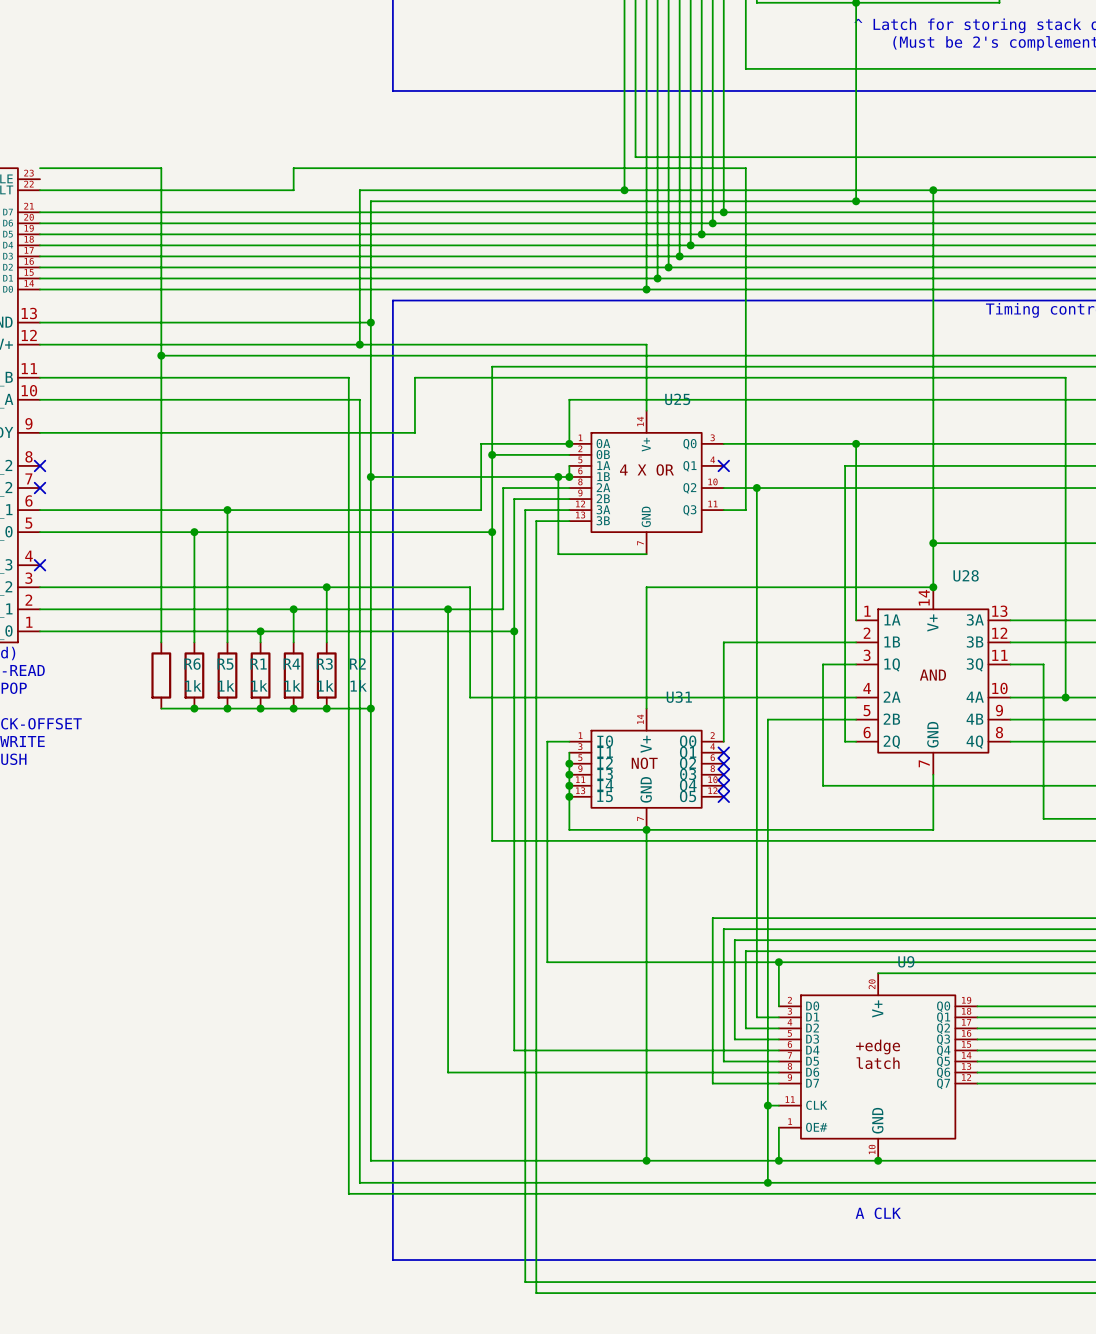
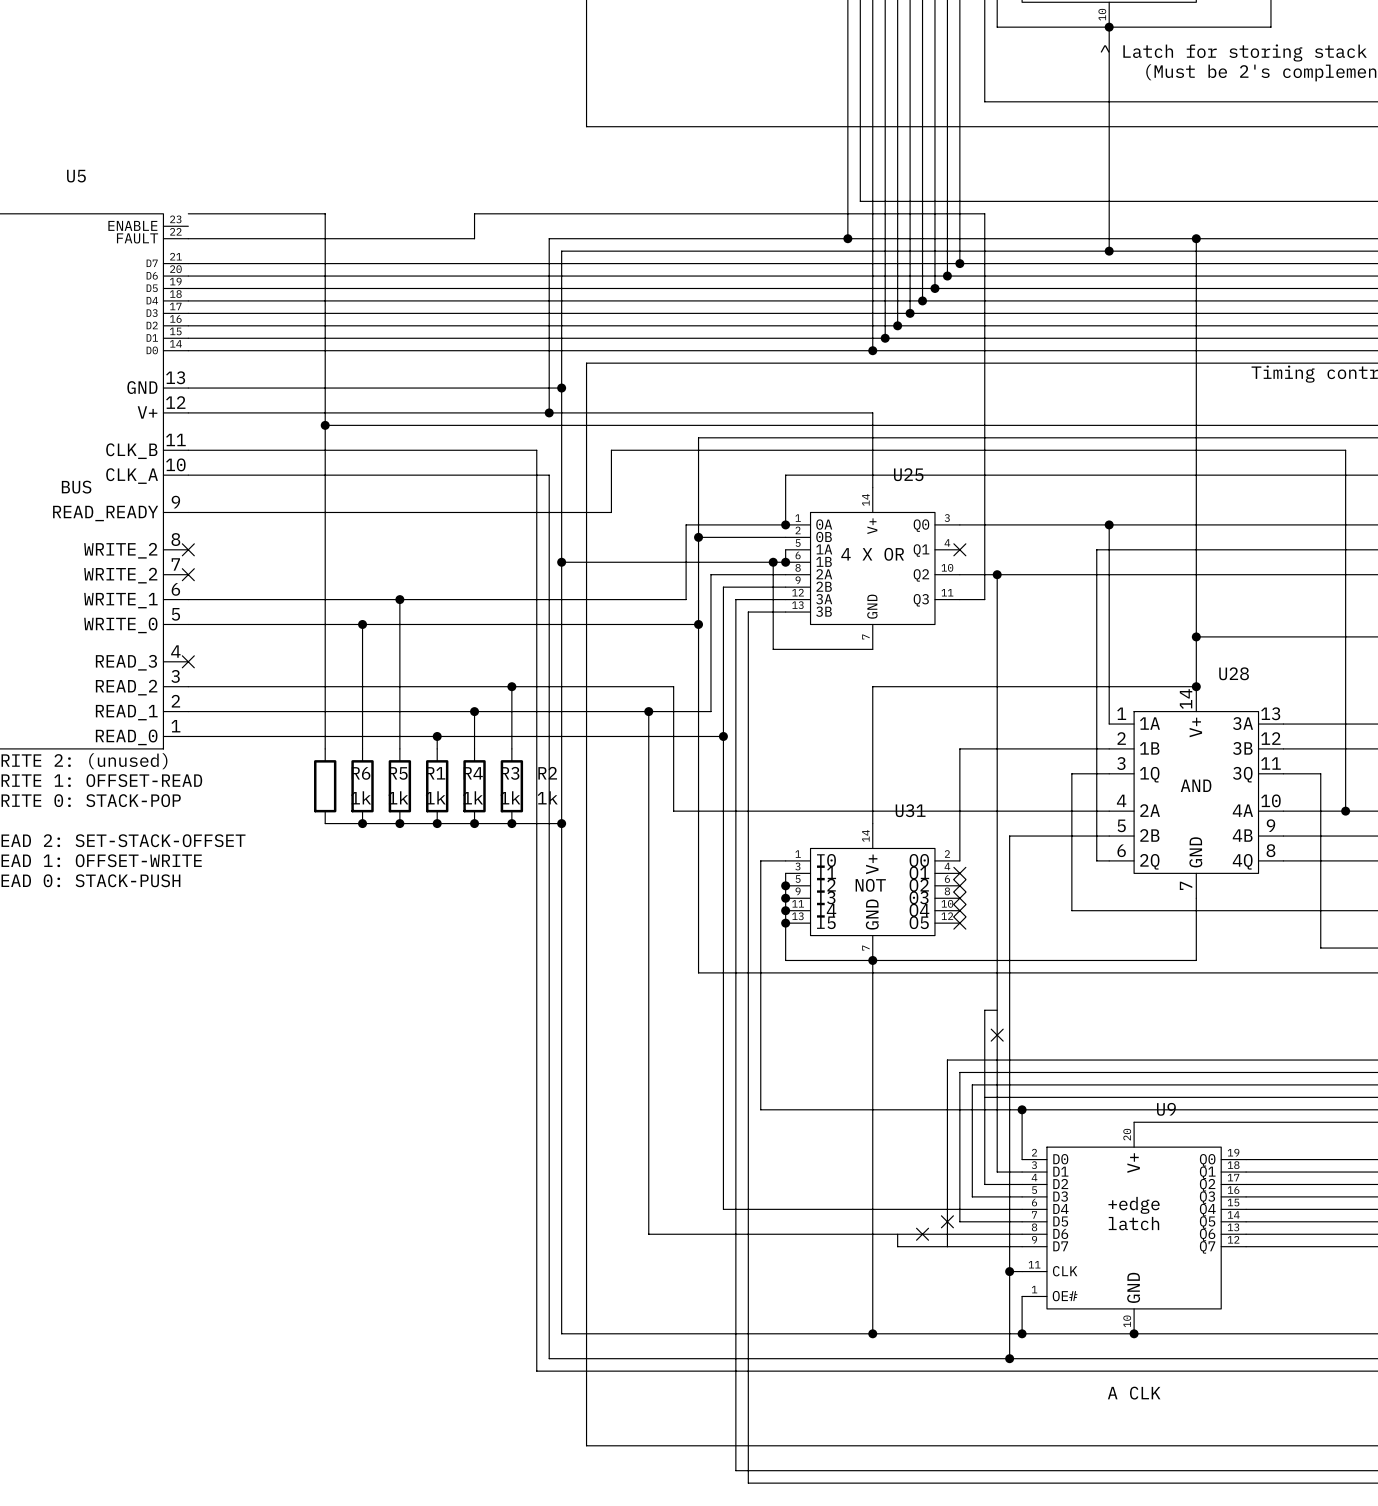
line: none -> (997, 1010) (984, 1010) (984, 1097)
no-connect mark: none -> (997, 1035)
no-connect mark: none -> (947, 1221)
line: none -> (897, 1234) (897, 1246) (947, 1246)
no-connect mark: none -> (922, 1234)

